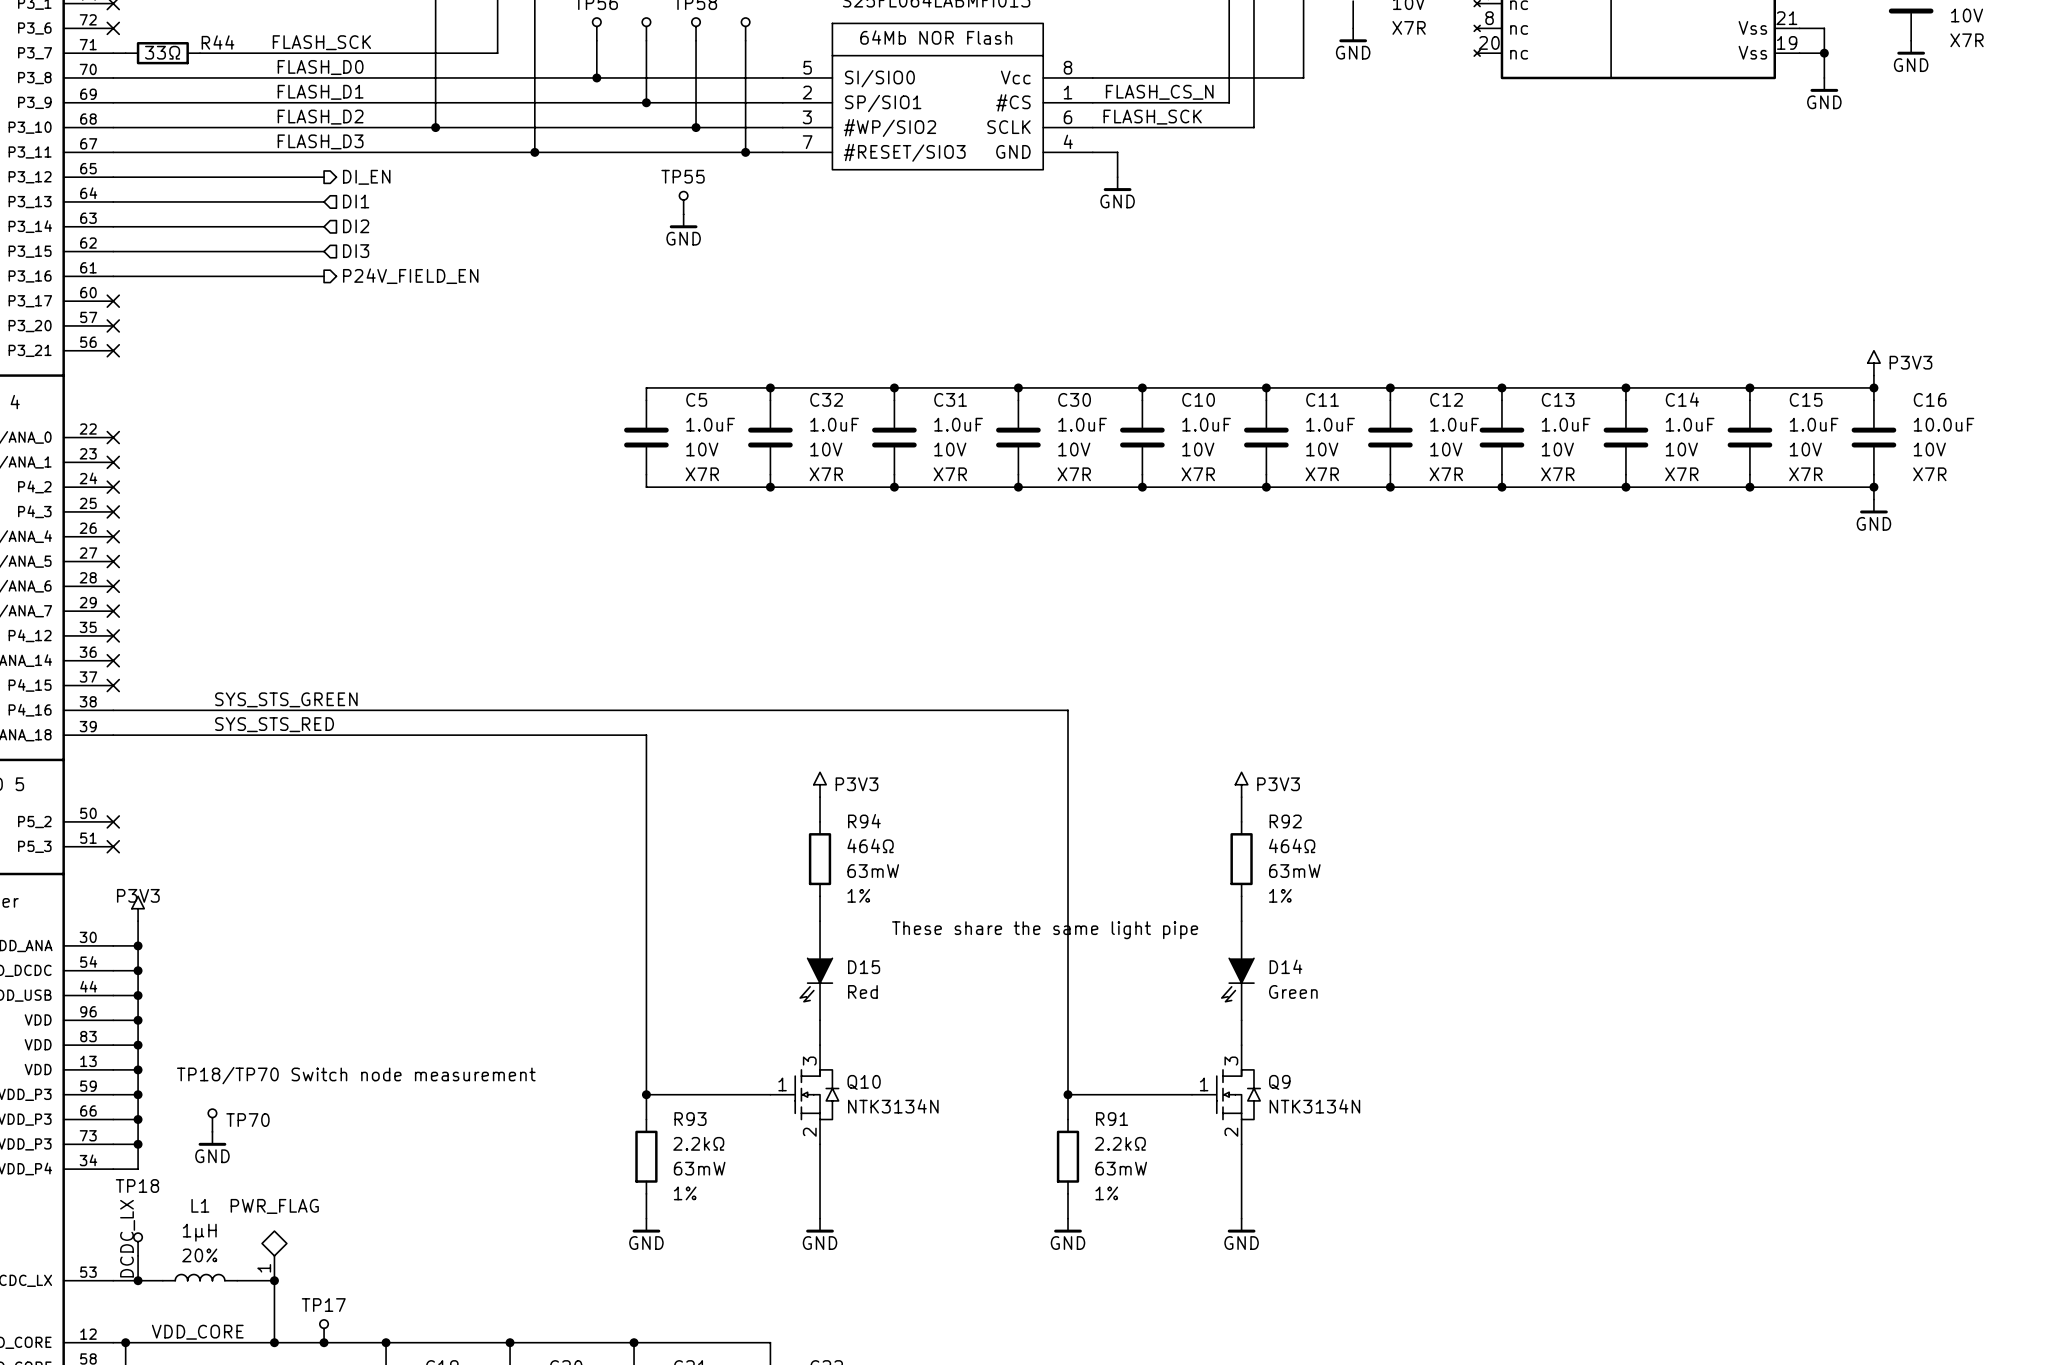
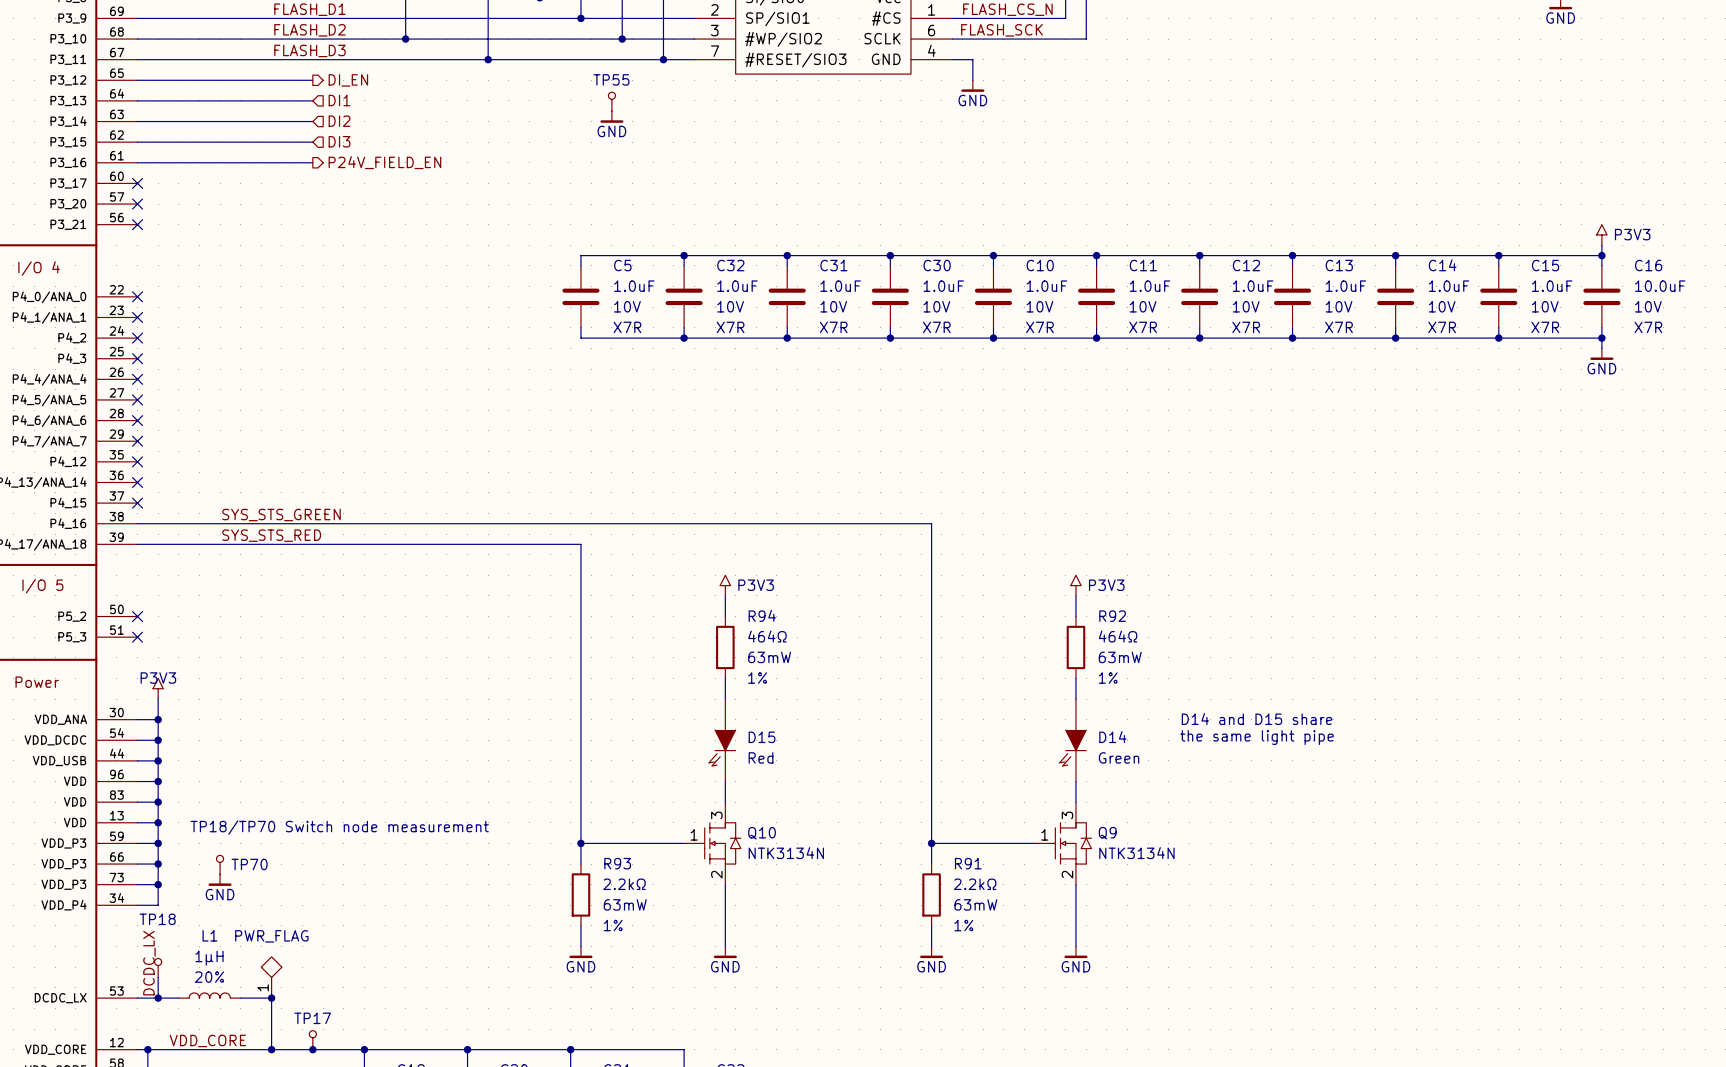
text: These share the same light pipe (1045, 930) -> none
text: none -> D14 and D15 share (1257, 719)
text: none -> the same light pipe (1257, 737)

